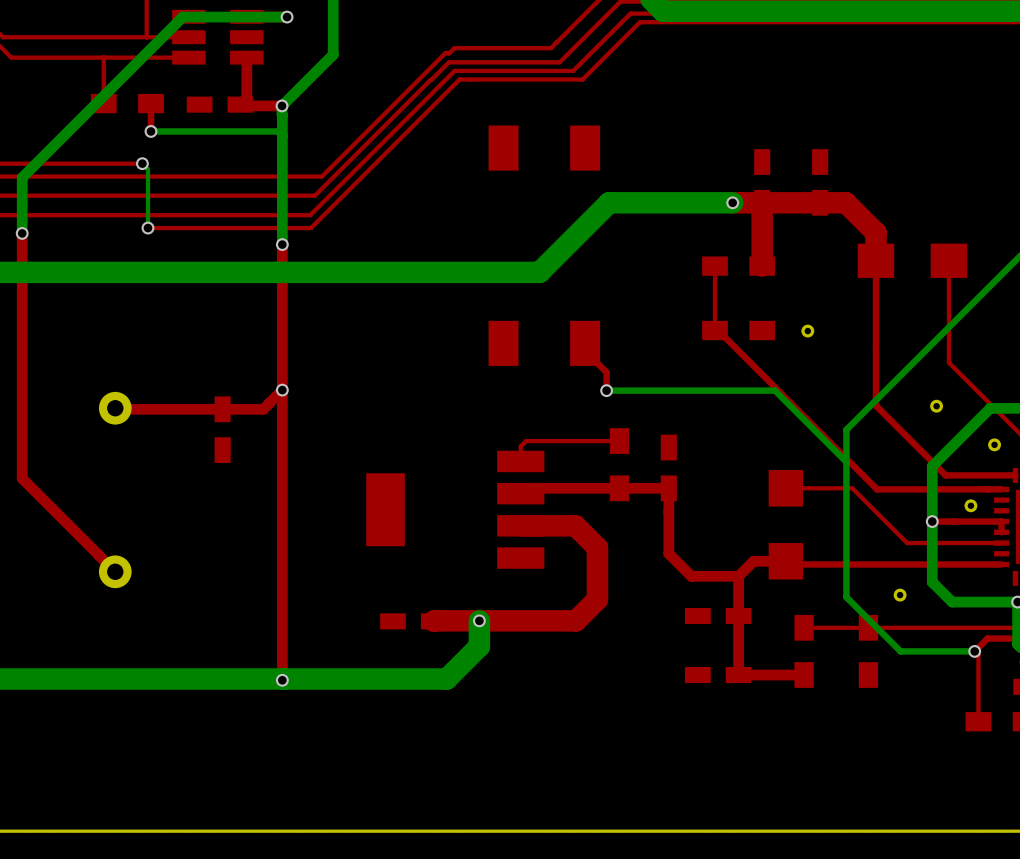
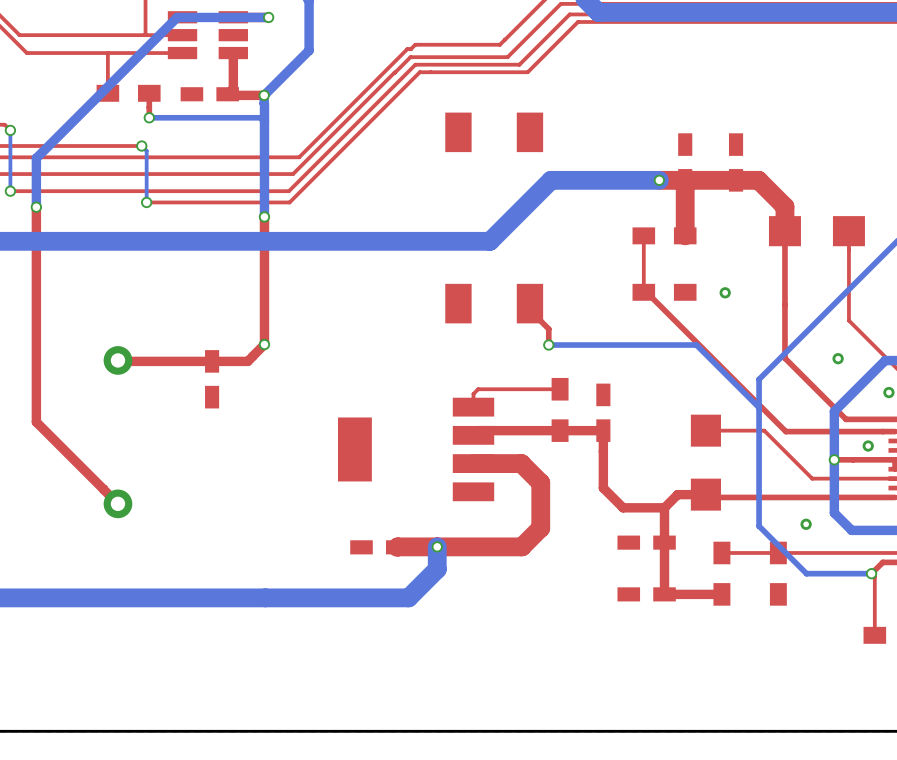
top track: (282, 390) (282, 680) -> none
via: (282, 680) -> none

